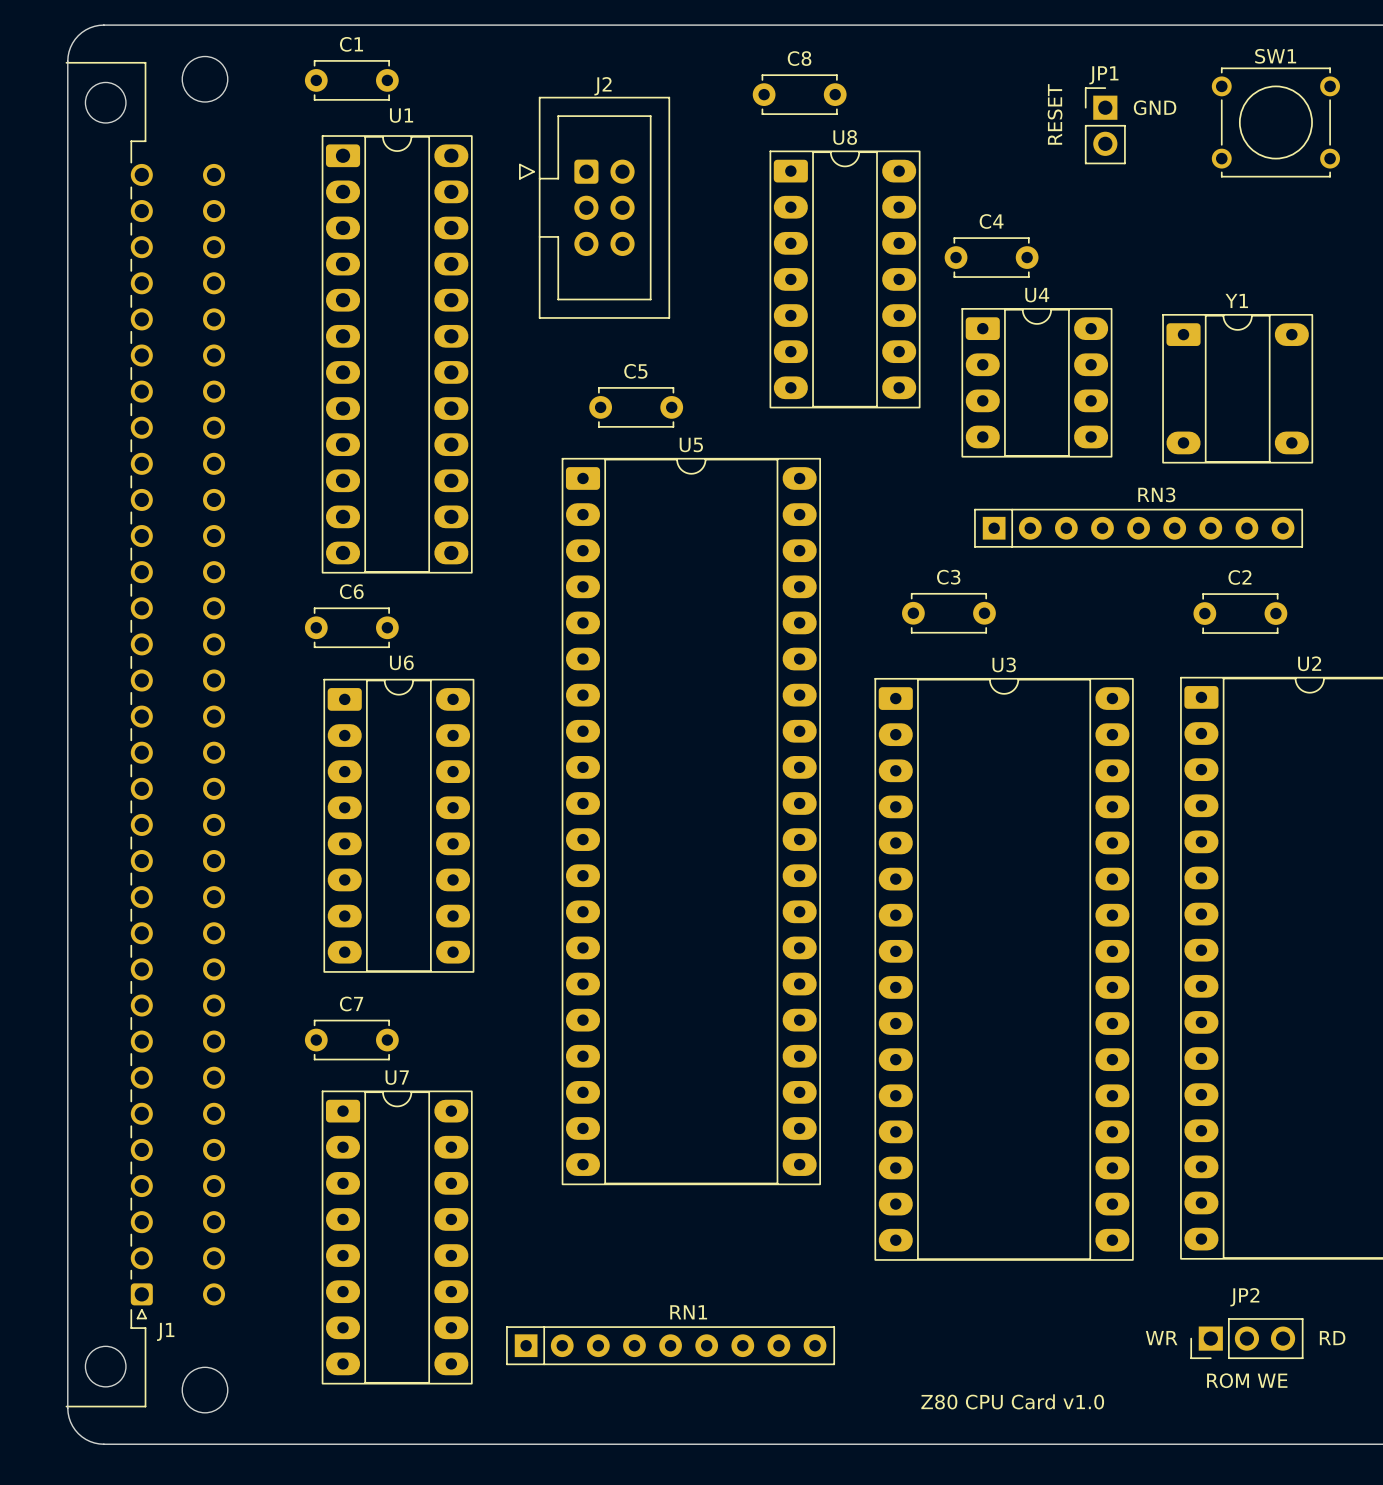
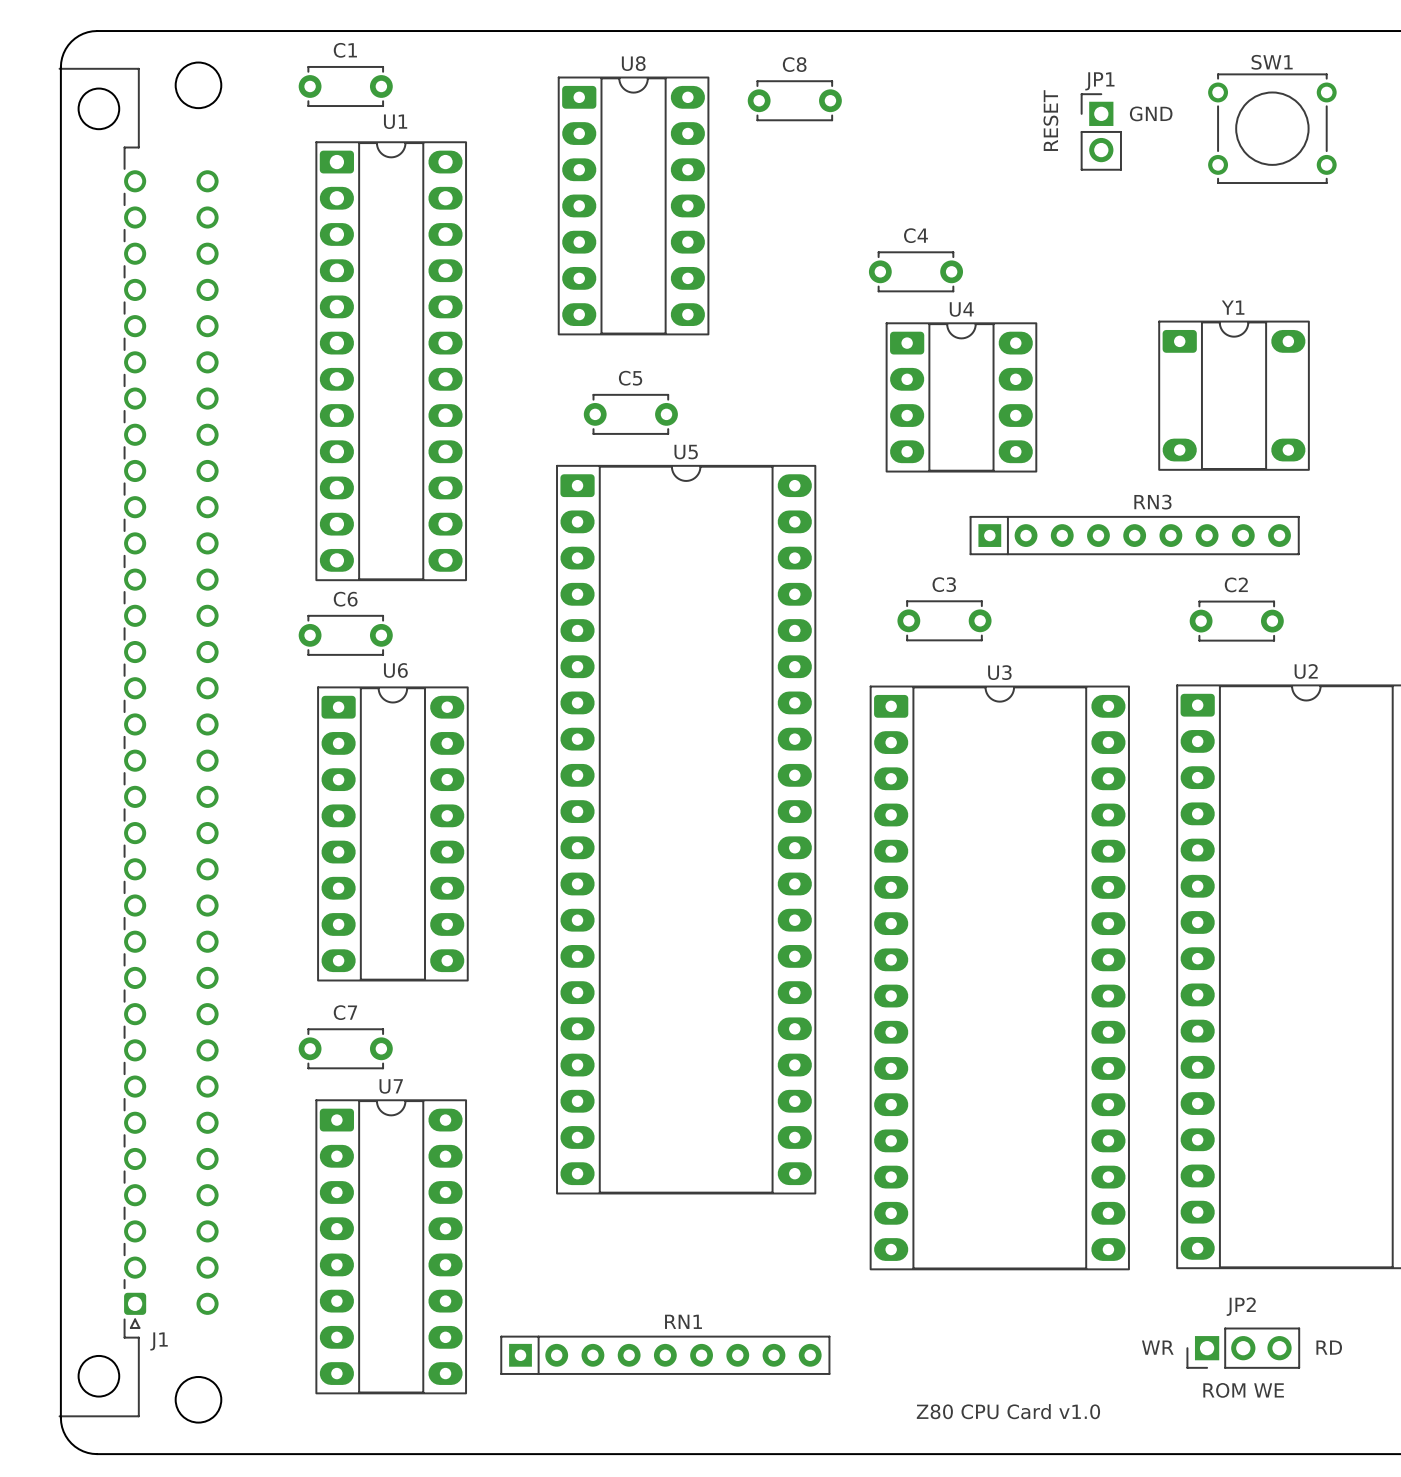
J2: (594, 207) -> none
C4 position: (991, 257) -> (915, 271)
U8 position: (845, 279) -> (633, 205)
U4 position: (1036, 382) -> (961, 397)

